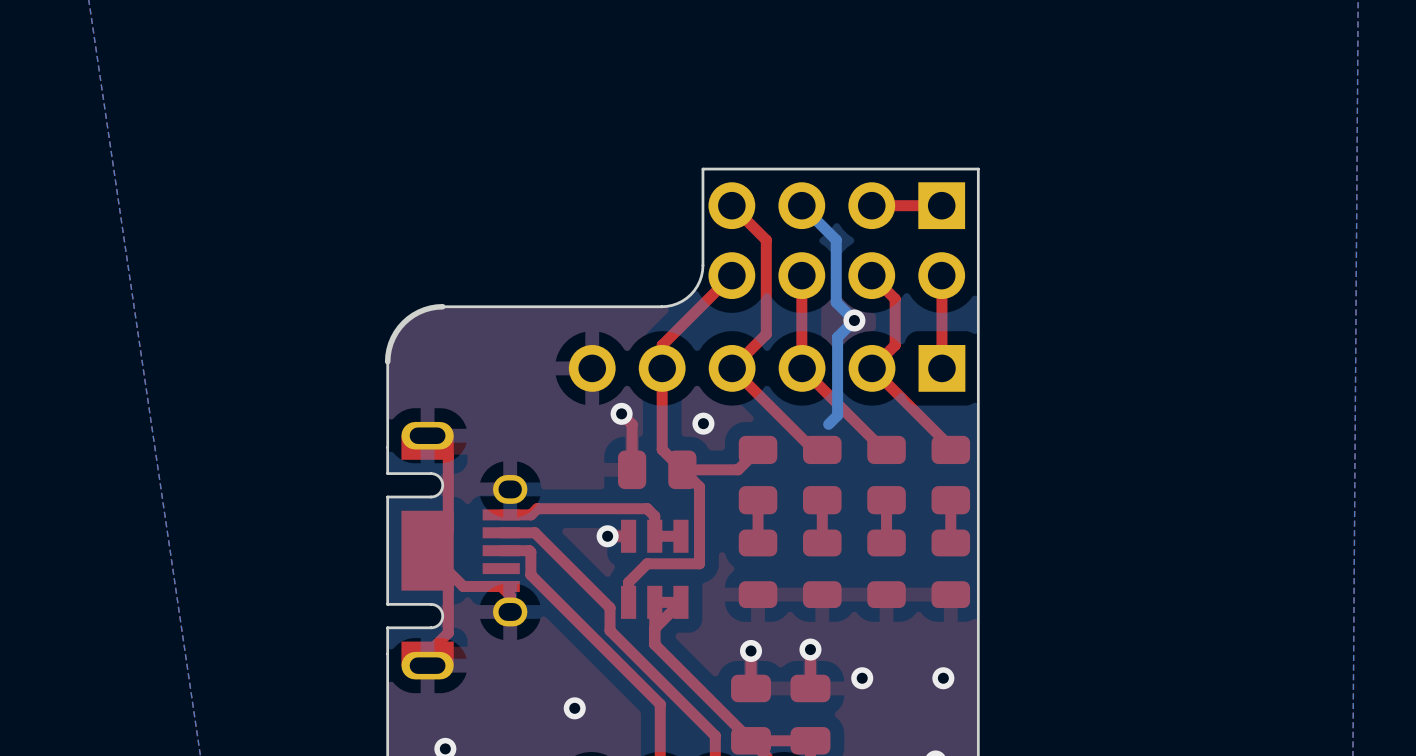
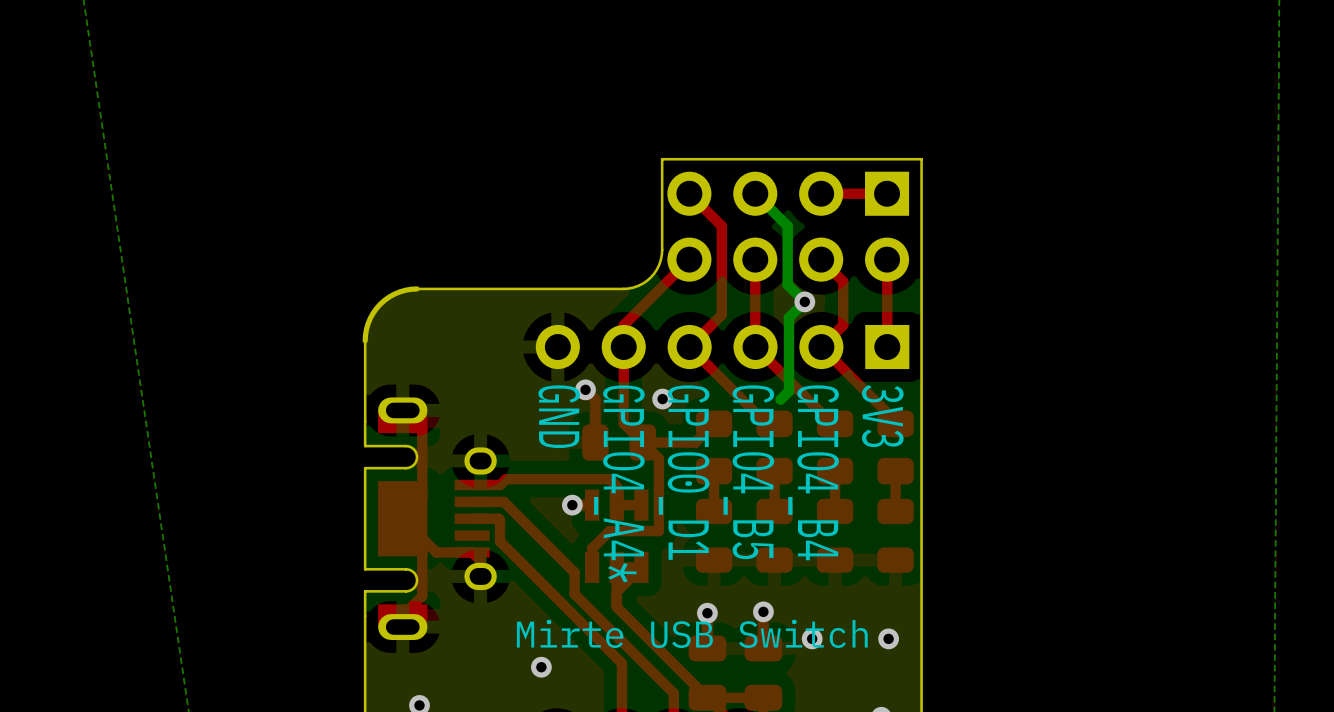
text: none -> 3V3 (882, 416)
text: none -> GND (559, 416)
text: none -> GPIO0_D1 (684, 472)
text: none -> GPIO4_B5 (748, 472)
text: none -> GPIO4_B4 (813, 472)
text: none -> GPIO4_A4* (619, 483)
text: none -> Mirte USB Switch (692, 633)

